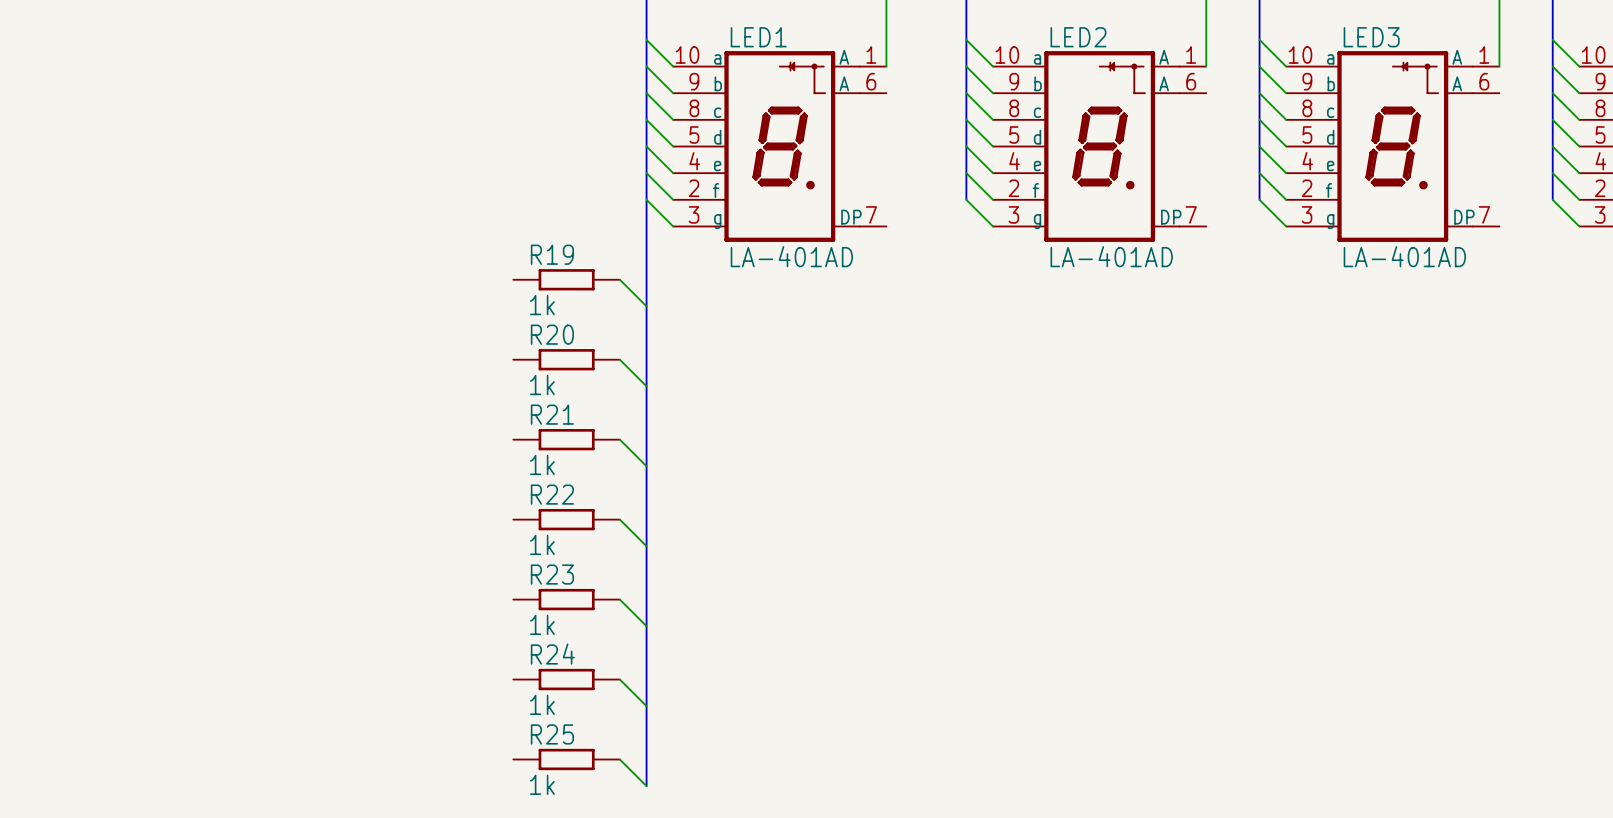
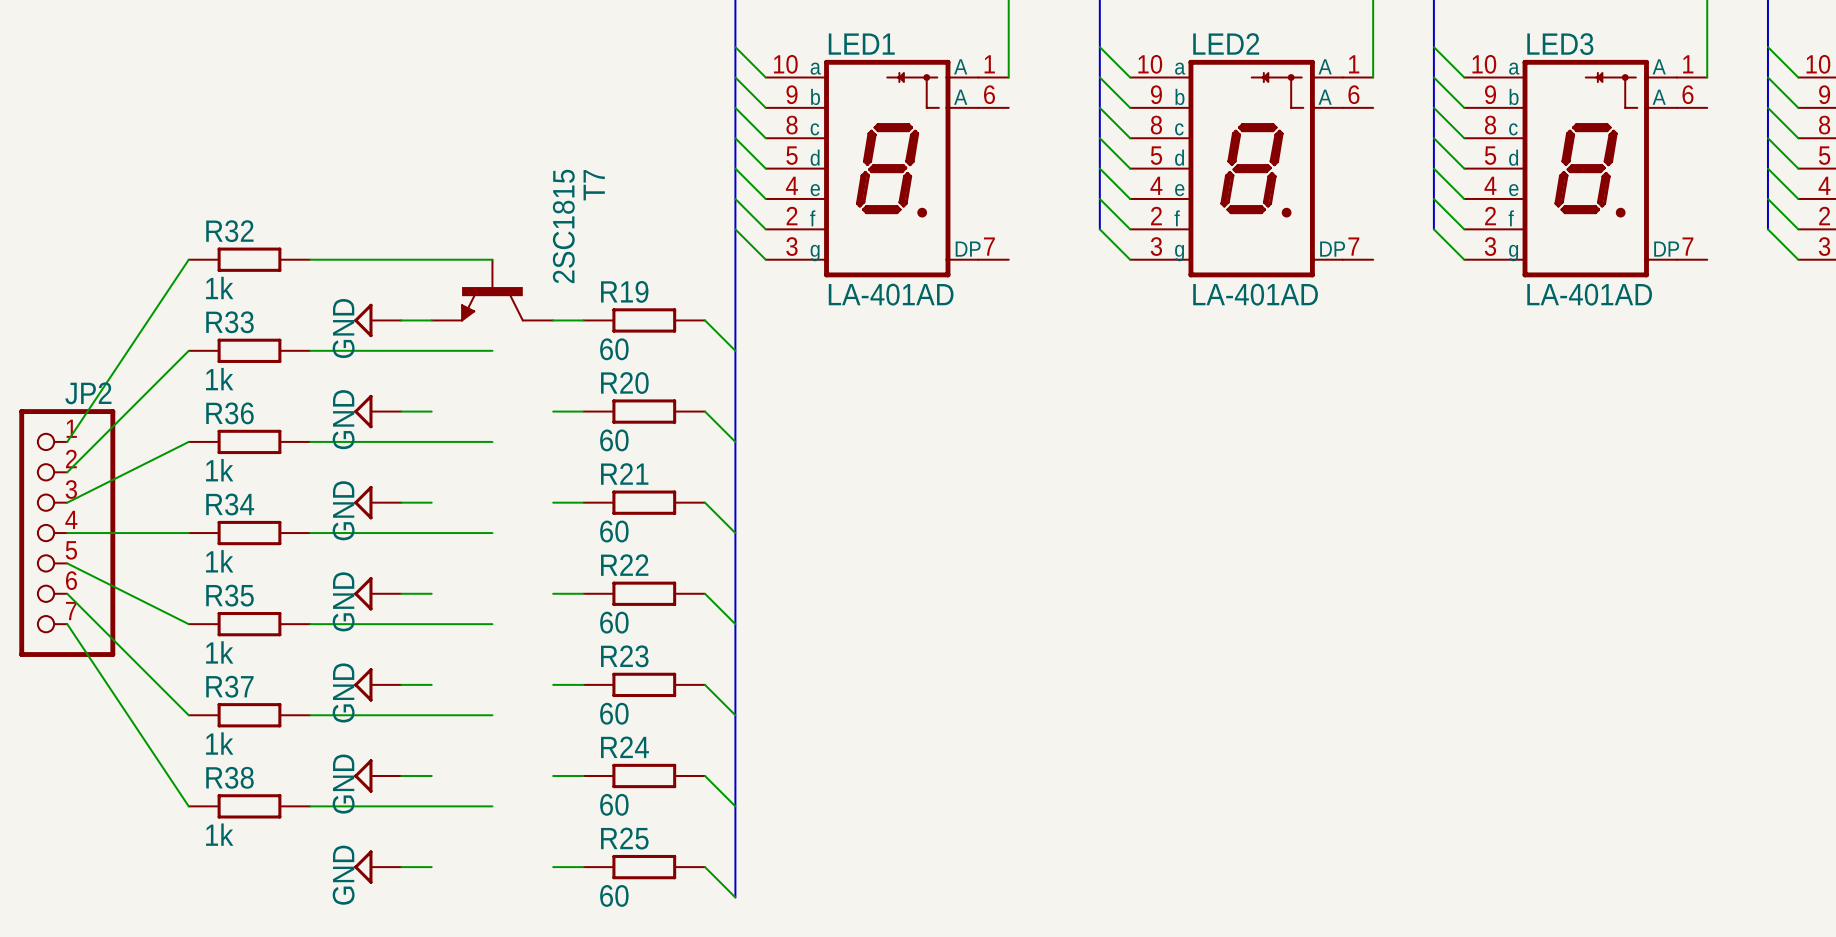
wire: none -> (188, 259) (67, 441)
R32: none -> 1k (249, 259)
wire: none -> (310, 259) (492, 259)
T7: none -> 2SC1815 (492, 290)
power symbol: none -> GND (377, 320)
wire: none -> (401, 320) (431, 320)
wire: none -> (553, 320) (583, 320)
R19 value: 1k (542, 305) -> 60 (614, 349)
wire: none -> (188, 350) (67, 472)
R33: none -> 1k (249, 350)
wire: none -> (310, 350) (492, 350)
power symbol: none -> GND (377, 411)
wire: none -> (401, 411) (431, 411)
wire: none -> (553, 411) (583, 411)
R20 value: 1k (542, 385) -> 60 (614, 440)
wire: none -> (188, 441) (67, 502)
R36: none -> 1k (249, 441)
wire: none -> (310, 441) (492, 441)
power symbol: none -> GND (377, 502)
wire: none -> (401, 502) (431, 502)
wire: none -> (553, 502) (583, 502)
R21 value: 1k (542, 465) -> 60 (614, 531)
wire: none -> (67, 533) (188, 533)
JP2: none -> (67, 533)
R34: none -> 1k (249, 533)
wire: none -> (310, 533) (492, 533)
wire: none -> (67, 563) (188, 624)
wire: none -> (67, 593) (188, 715)
power symbol: none -> GND (377, 593)
wire: none -> (401, 593) (431, 593)
wire: none -> (553, 593) (583, 593)
R22 value: 1k (542, 544) -> 60 (614, 622)
wire: none -> (67, 624) (188, 806)
R35: none -> 1k (249, 624)
wire: none -> (310, 624) (492, 624)
power symbol: none -> GND (377, 684)
wire: none -> (401, 684) (431, 684)
wire: none -> (553, 684) (583, 684)
R23 value: 1k (542, 624) -> 60 (614, 713)
R37: none -> 1k (249, 715)
wire: none -> (310, 715) (492, 715)
power symbol: none -> GND (377, 776)
wire: none -> (401, 776) (431, 776)
wire: none -> (553, 776) (583, 776)
R24 value: 1k (542, 704) -> 60 (614, 804)
R38: none -> 1k (249, 806)
wire: none -> (310, 806) (492, 806)
power symbol: none -> GND (377, 867)
wire: none -> (401, 867) (431, 867)
wire: none -> (553, 867) (583, 867)
R25 value: 1k (542, 784) -> 60 (614, 895)

